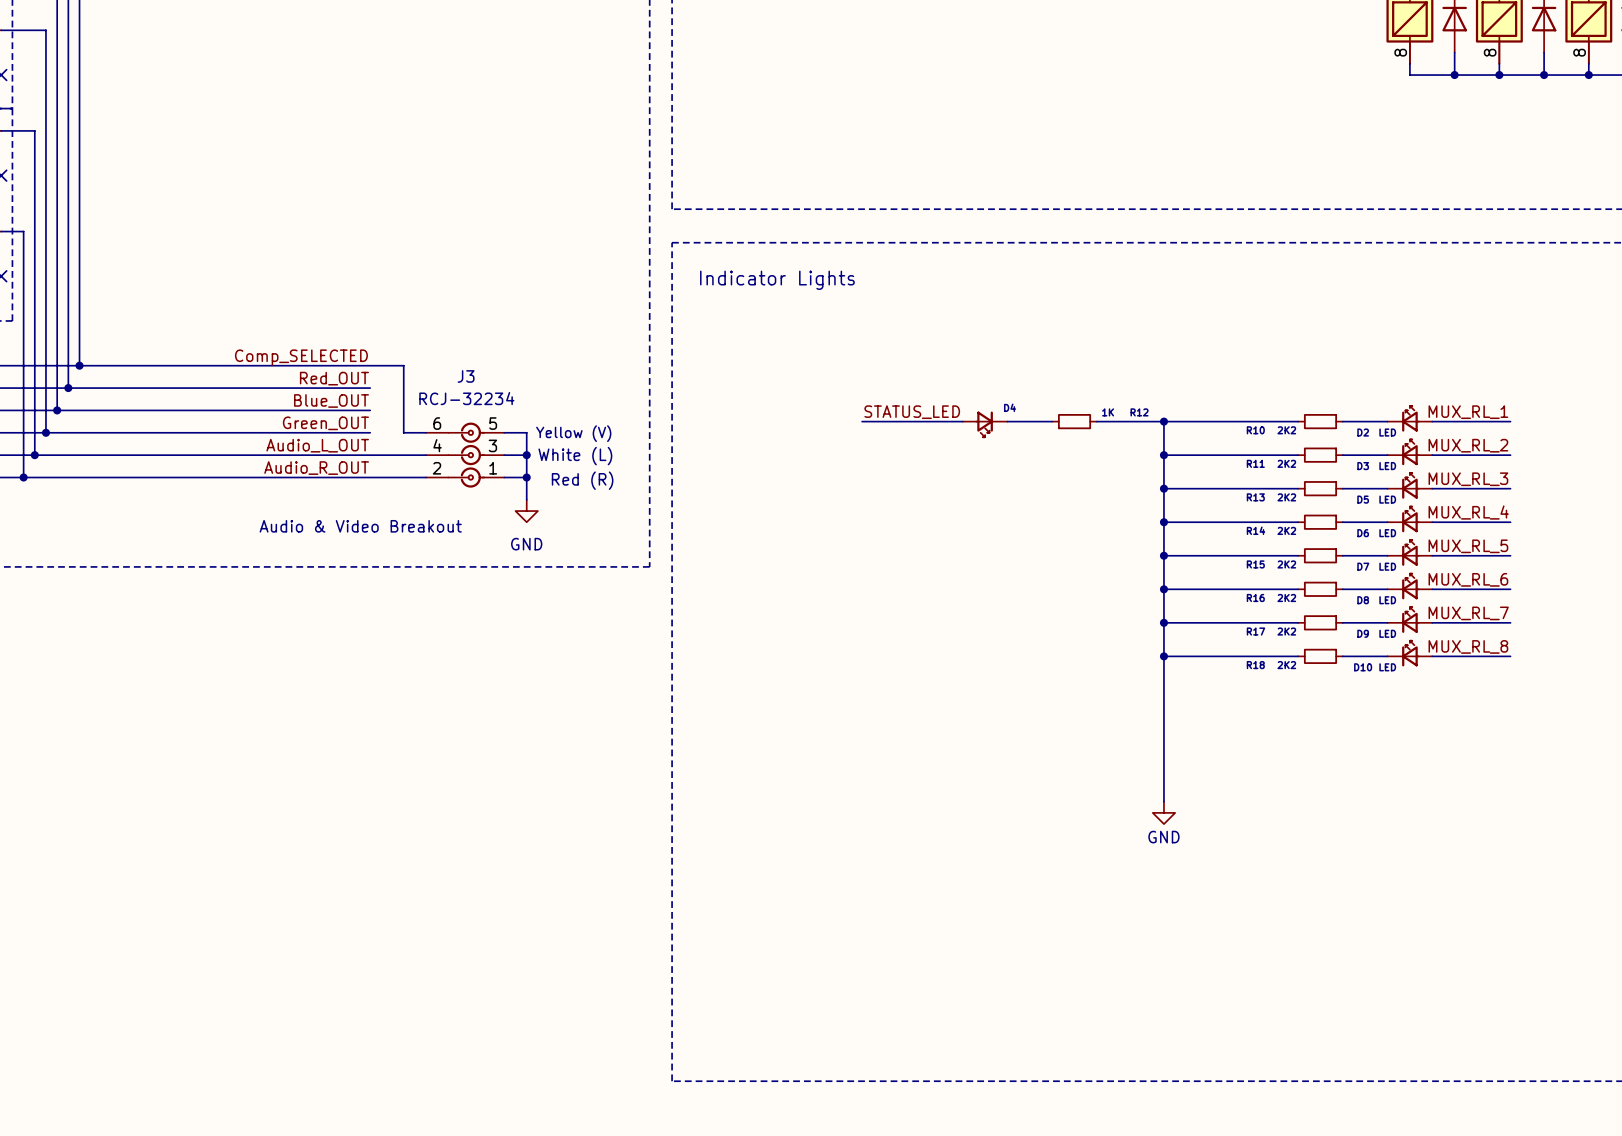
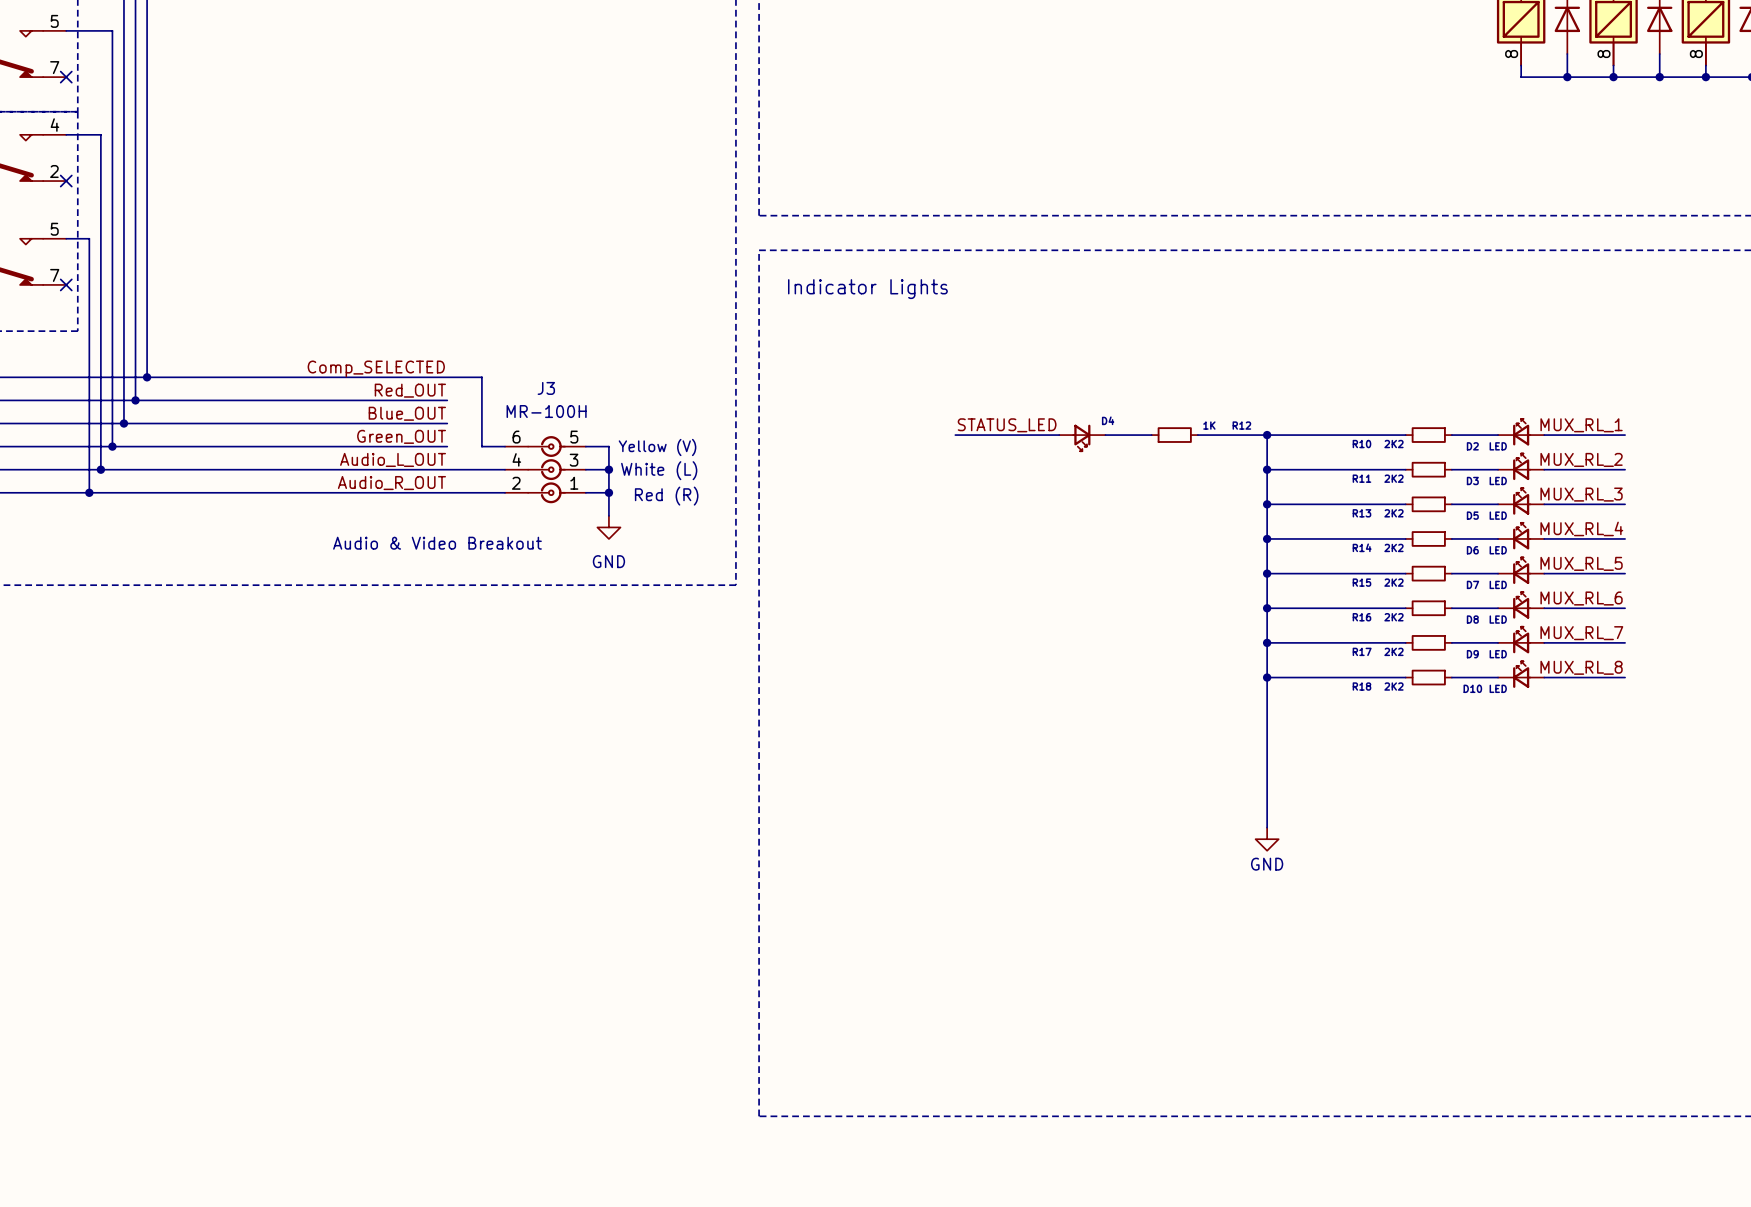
J3 value: RCJ-32234 (466, 398) -> MR-100H (546, 411)

